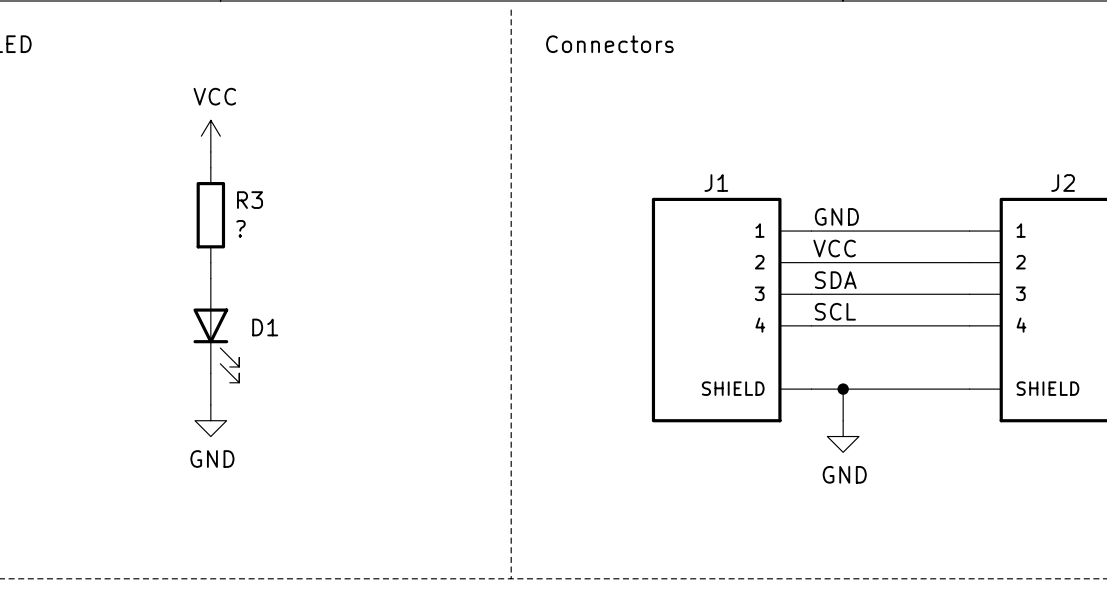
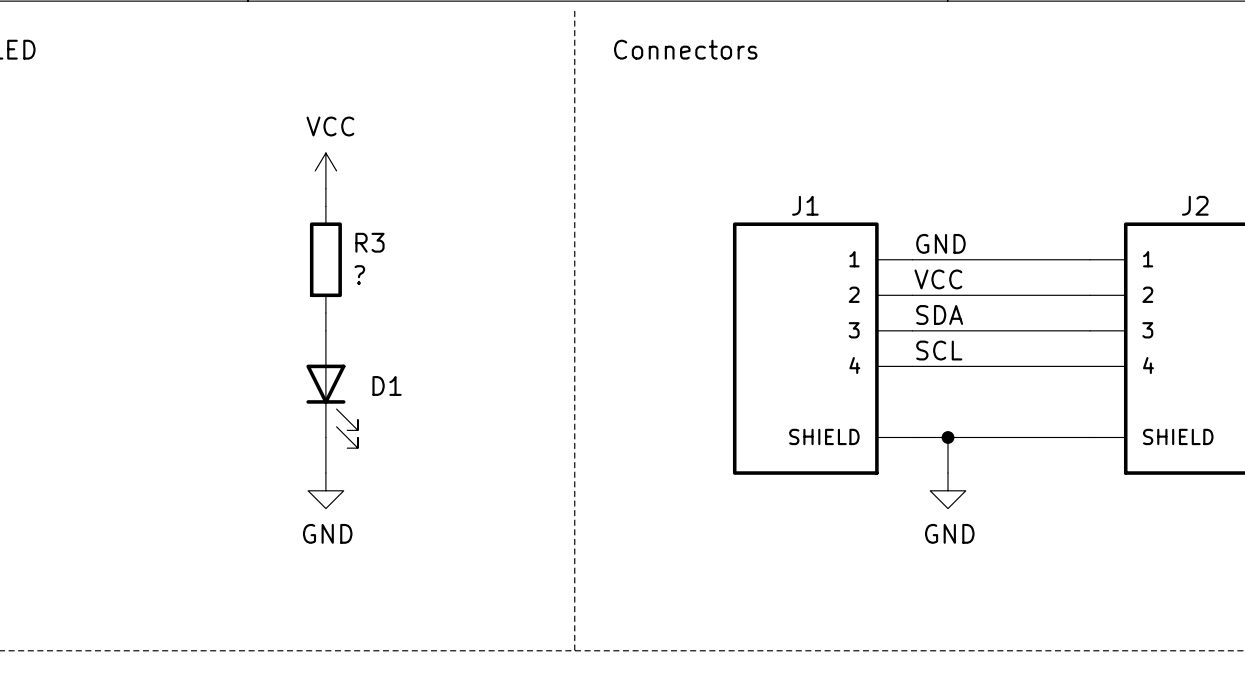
power symbol position: VCC (210, 136) -> VCC (325, 170)
wire: (210, 151) (210, 167) -> (325, 188) (325, 206)
R3 position: (210, 215) -> (325, 259)
wire: (210, 262) (210, 278) -> (325, 313) (325, 330)
D1 position: (216, 330) -> (332, 389)
wire: (210, 373) (210, 404) -> (325, 437) (325, 473)
power symbol position: GND (210, 420) -> GND (325, 490)

